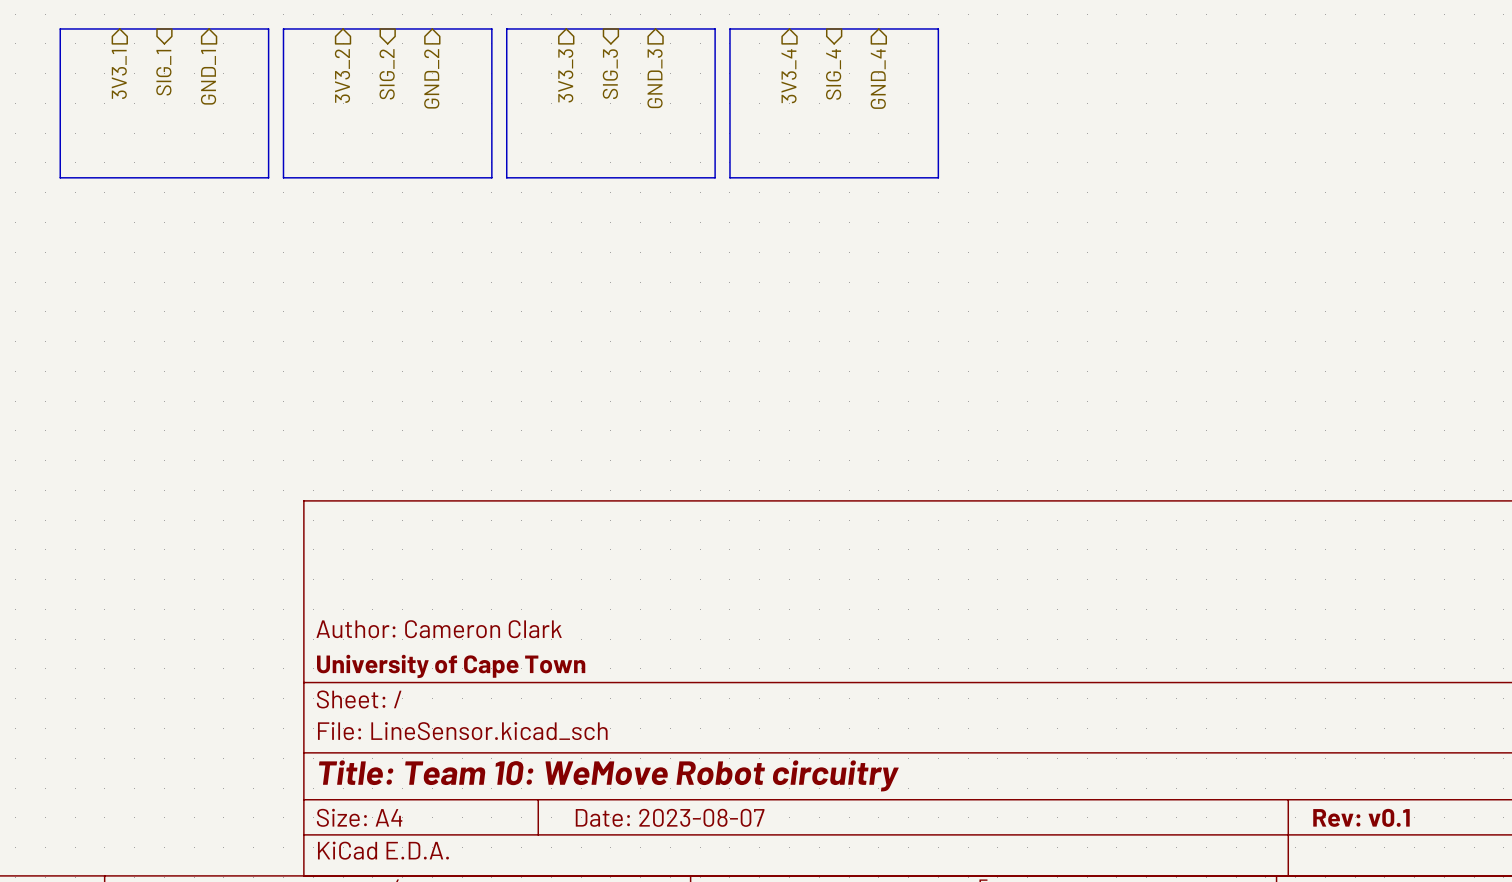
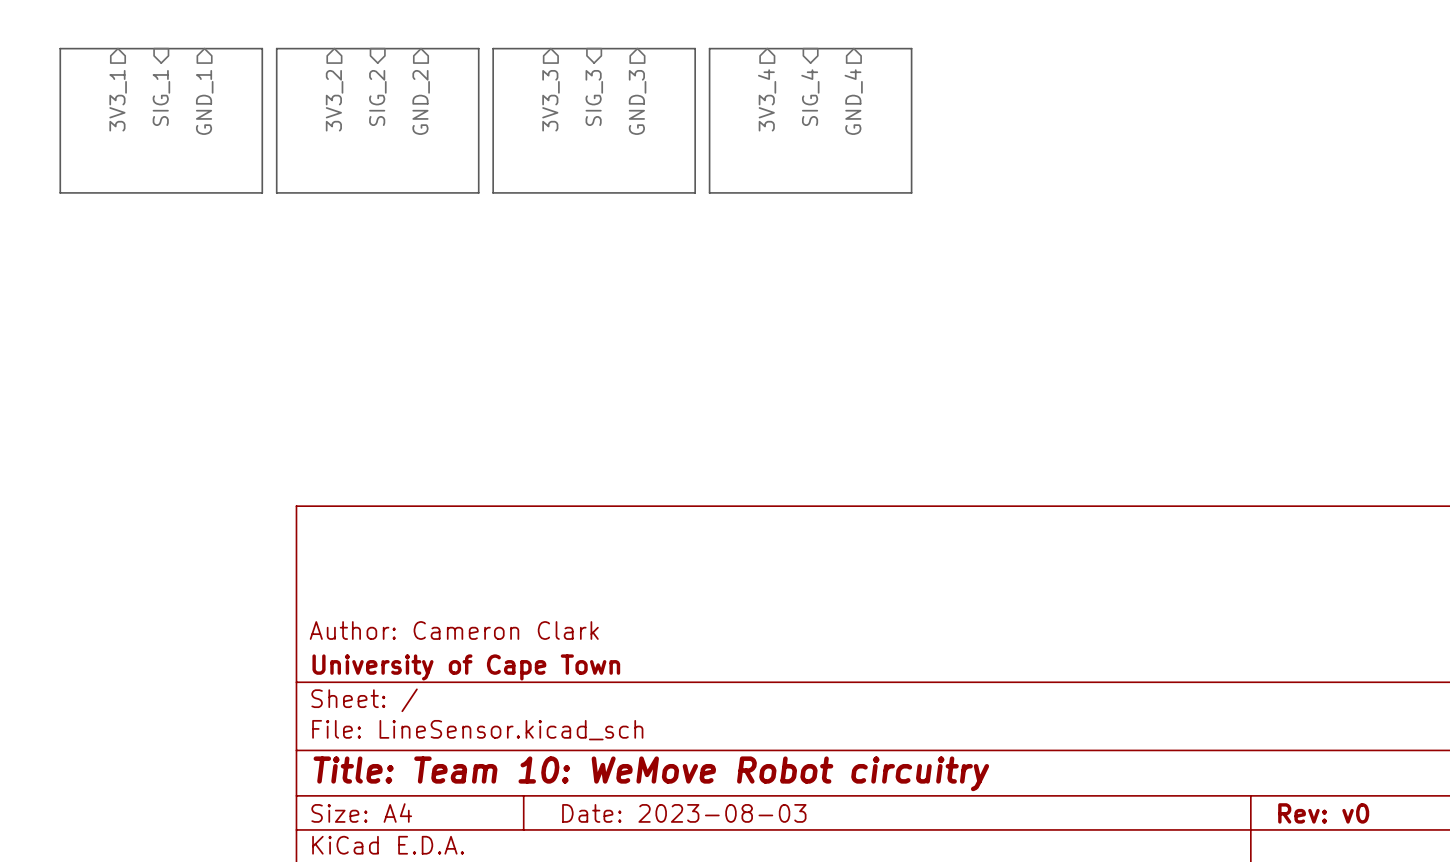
title block: Date: 2023-08-07 (670, 817) -> Date: 2023-08-03 (684, 813)
title block: Rev: v0.1 (1361, 817) -> Rev: v0 (1323, 813)

